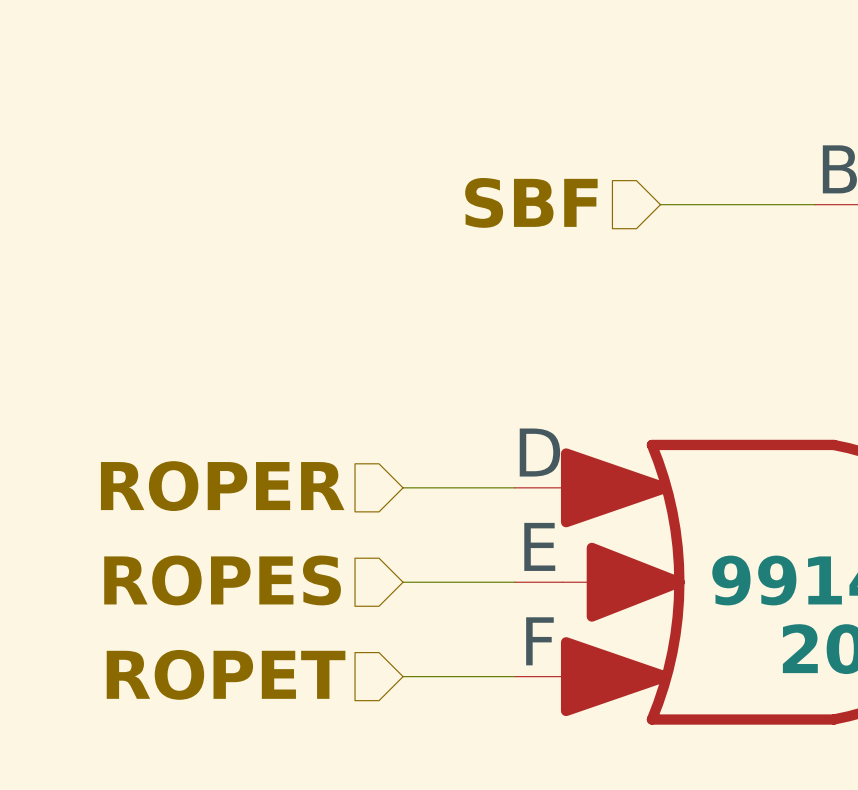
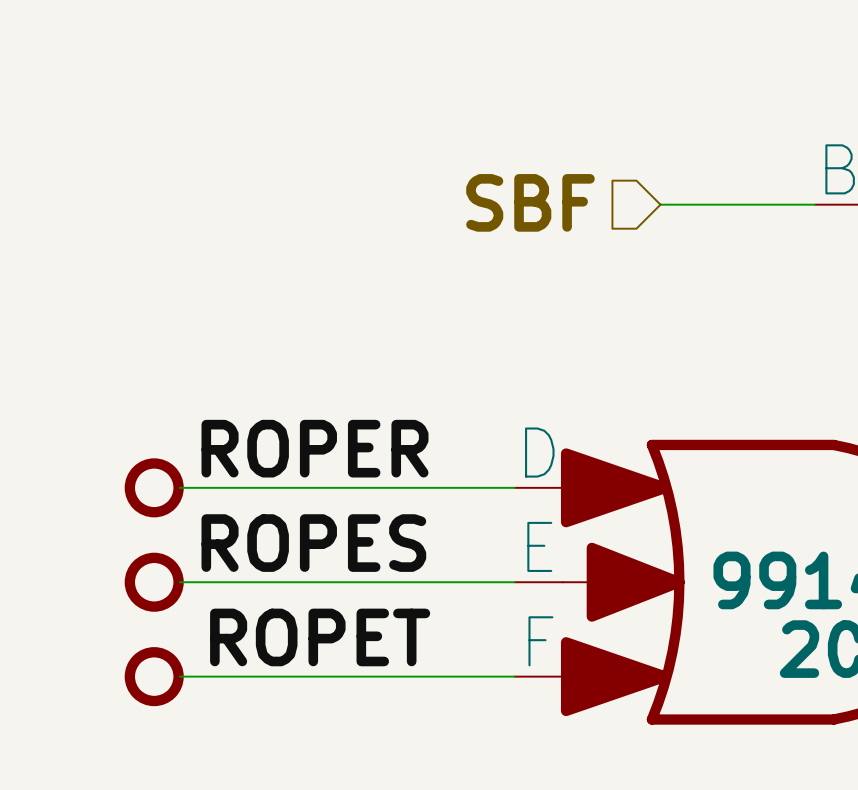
label: none -> ROPER (315, 448)
hierarchical label: ROPER (222, 486) -> none
part: none -> (154, 487)
wire: none -> (179, 487) (403, 487)
label: none -> ROPES (313, 543)
hierarchical label: ROPES (222, 580) -> none
part: none -> (154, 582)
wire: none -> (179, 582) (403, 582)
label: none -> ROPET (320, 637)
hierarchical label: ROPET (226, 674) -> none
part: none -> (154, 676)
wire: none -> (179, 676) (403, 676)

